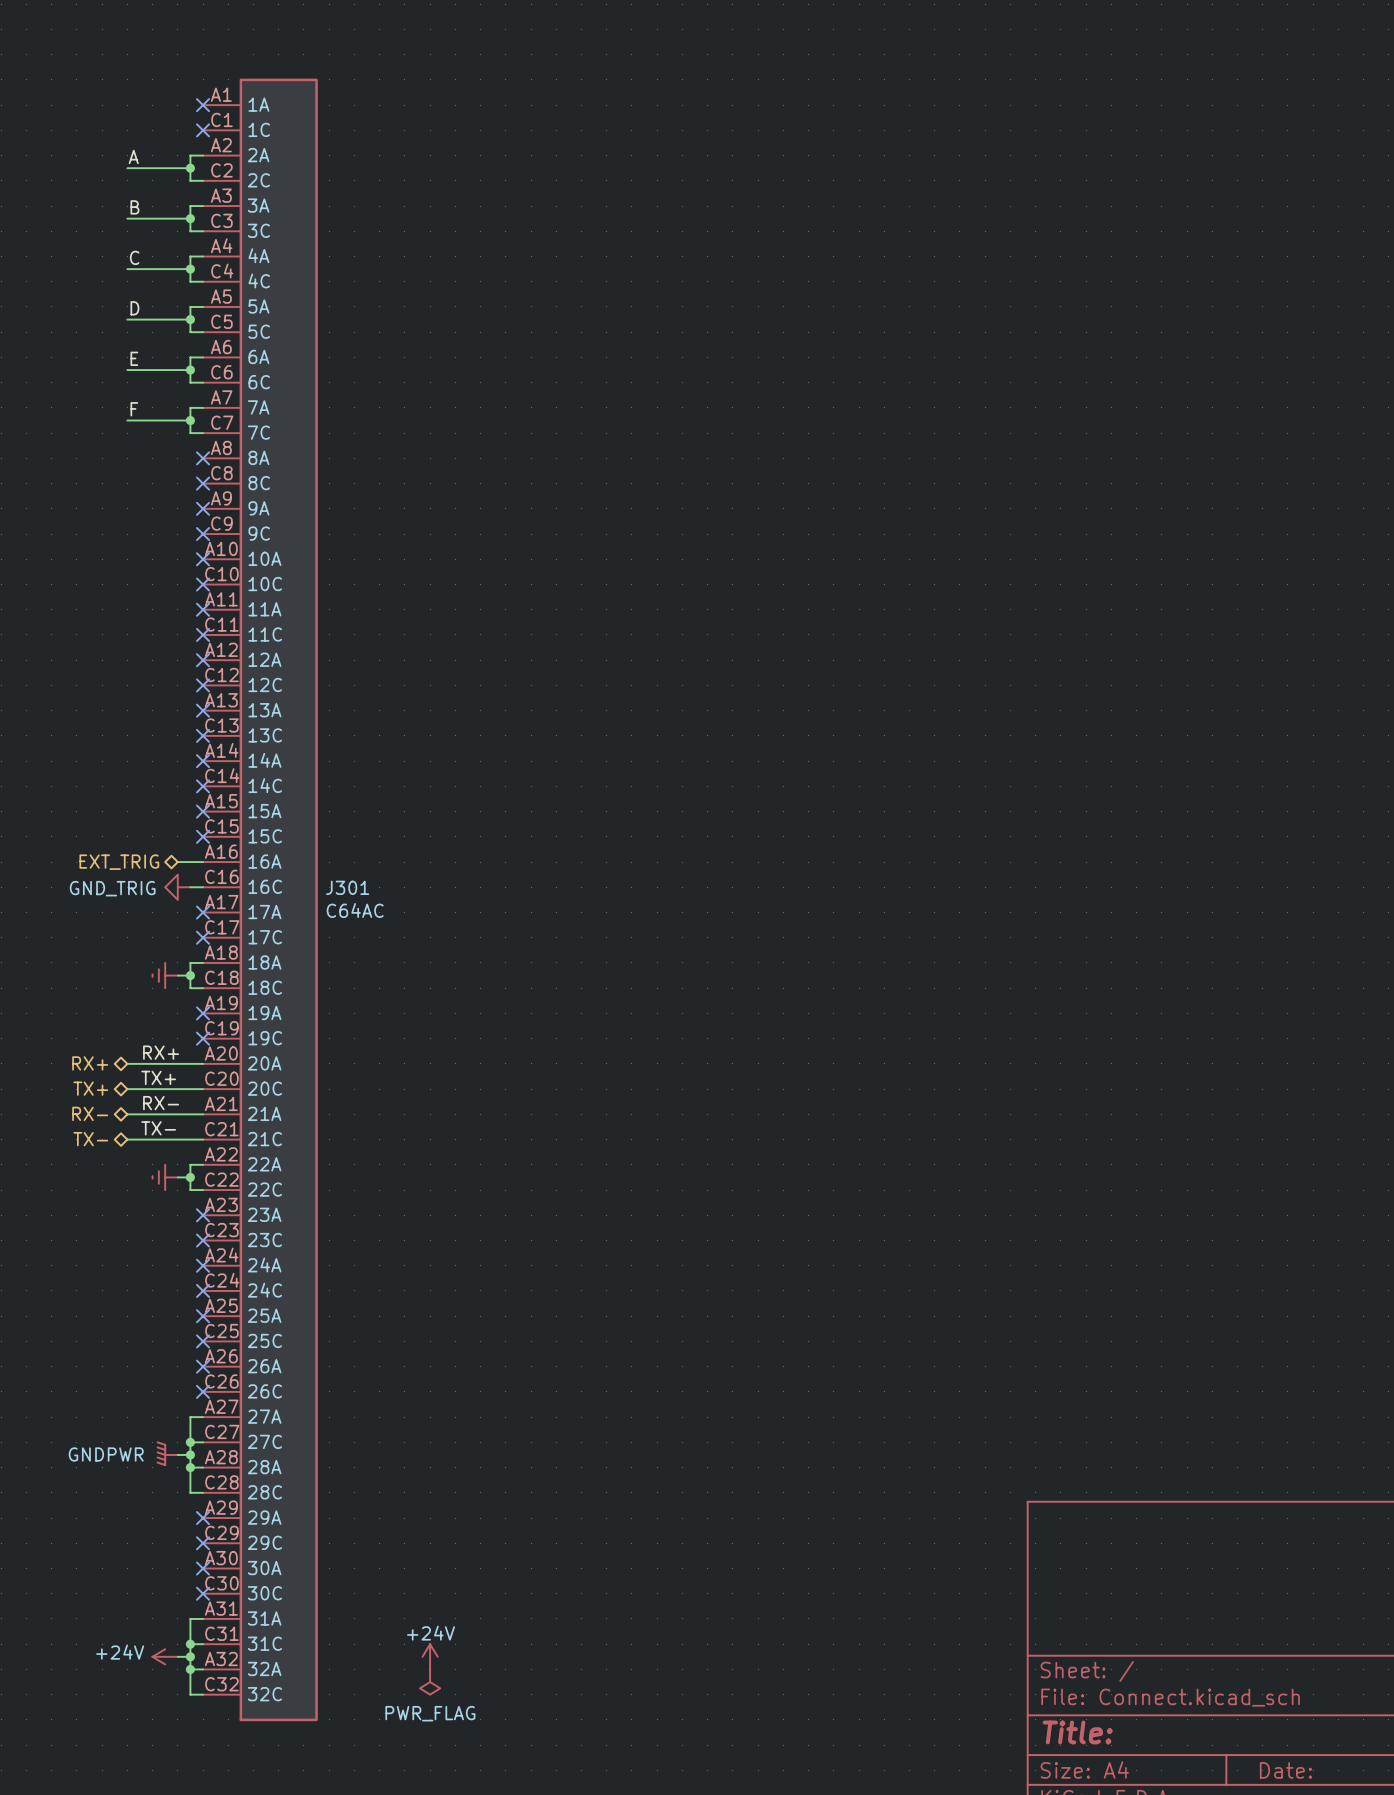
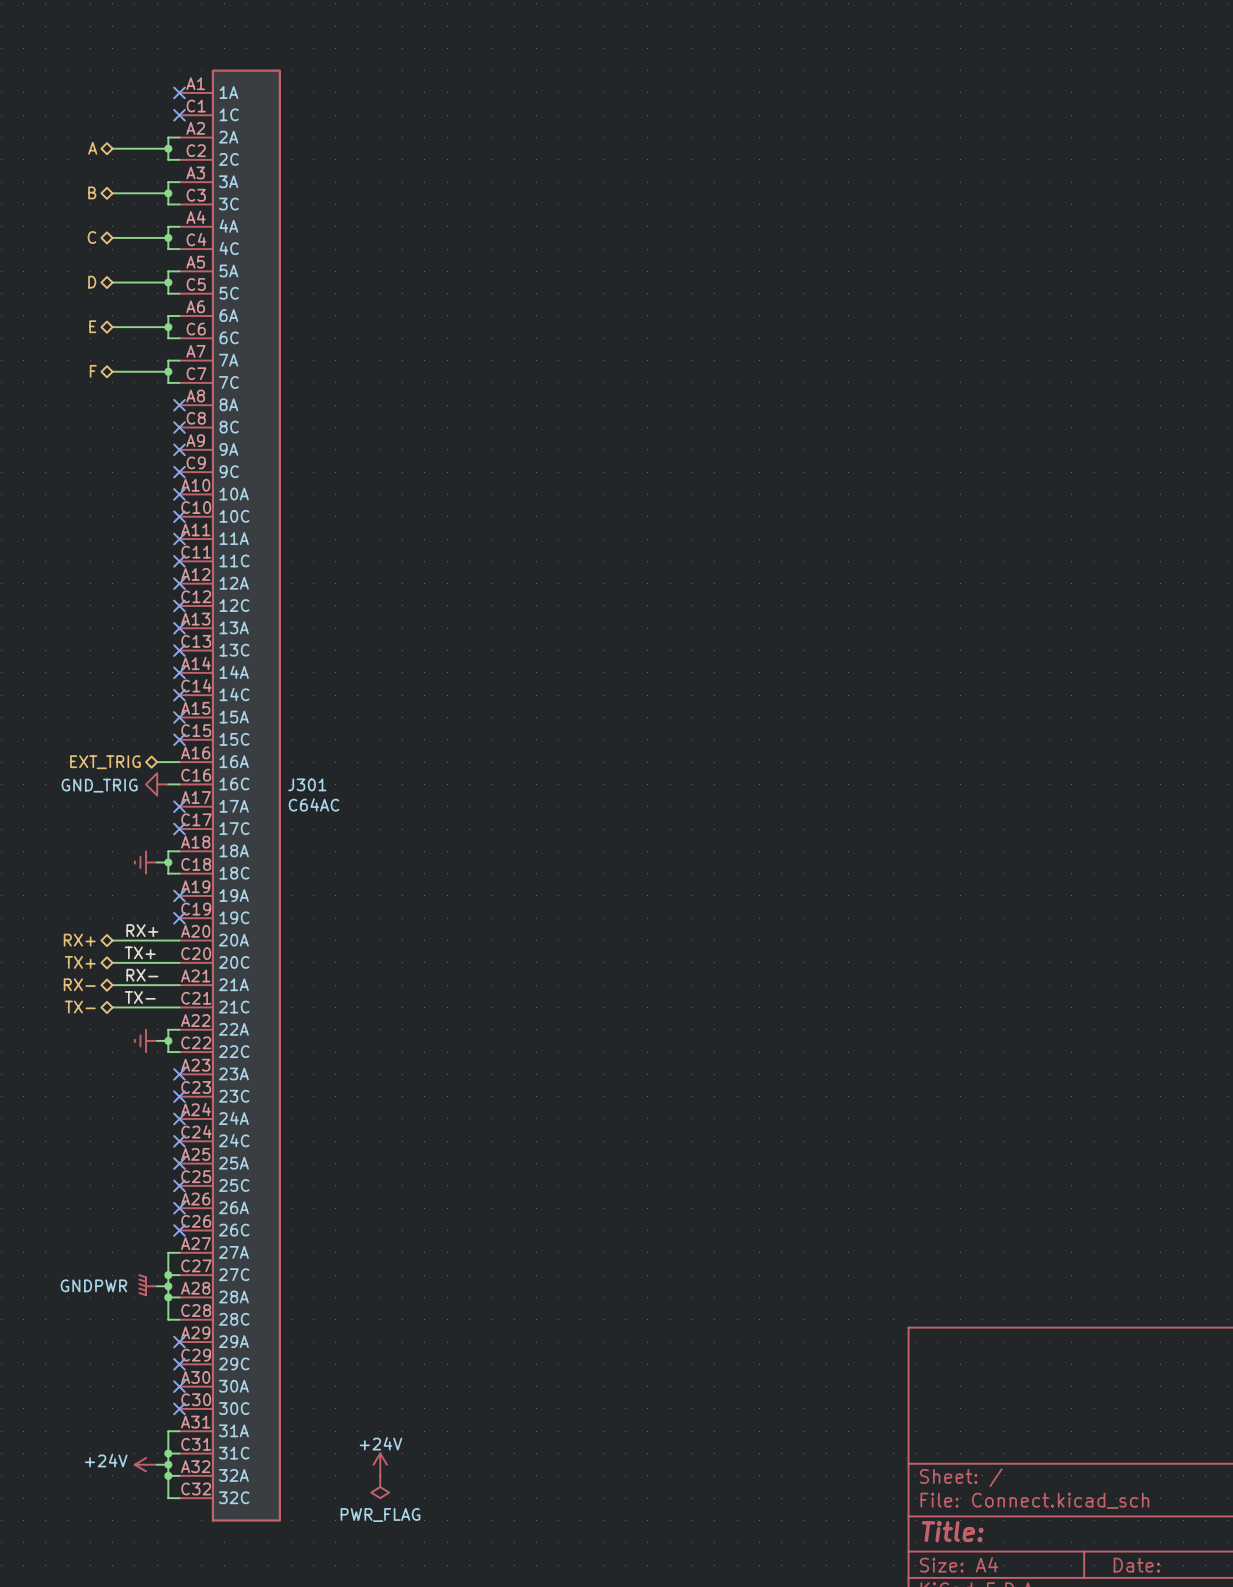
label: A (133, 156) -> none
hierarchical label: none -> A (92, 148)
label: B (134, 207) -> none
hierarchical label: none -> B (92, 192)
label: C (134, 257) -> none
hierarchical label: none -> C (91, 237)
label: D (134, 308) -> none
hierarchical label: none -> D (92, 282)
label: E (134, 358) -> none
hierarchical label: none -> E (92, 326)
label: F (134, 409) -> none
hierarchical label: none -> F (93, 371)

